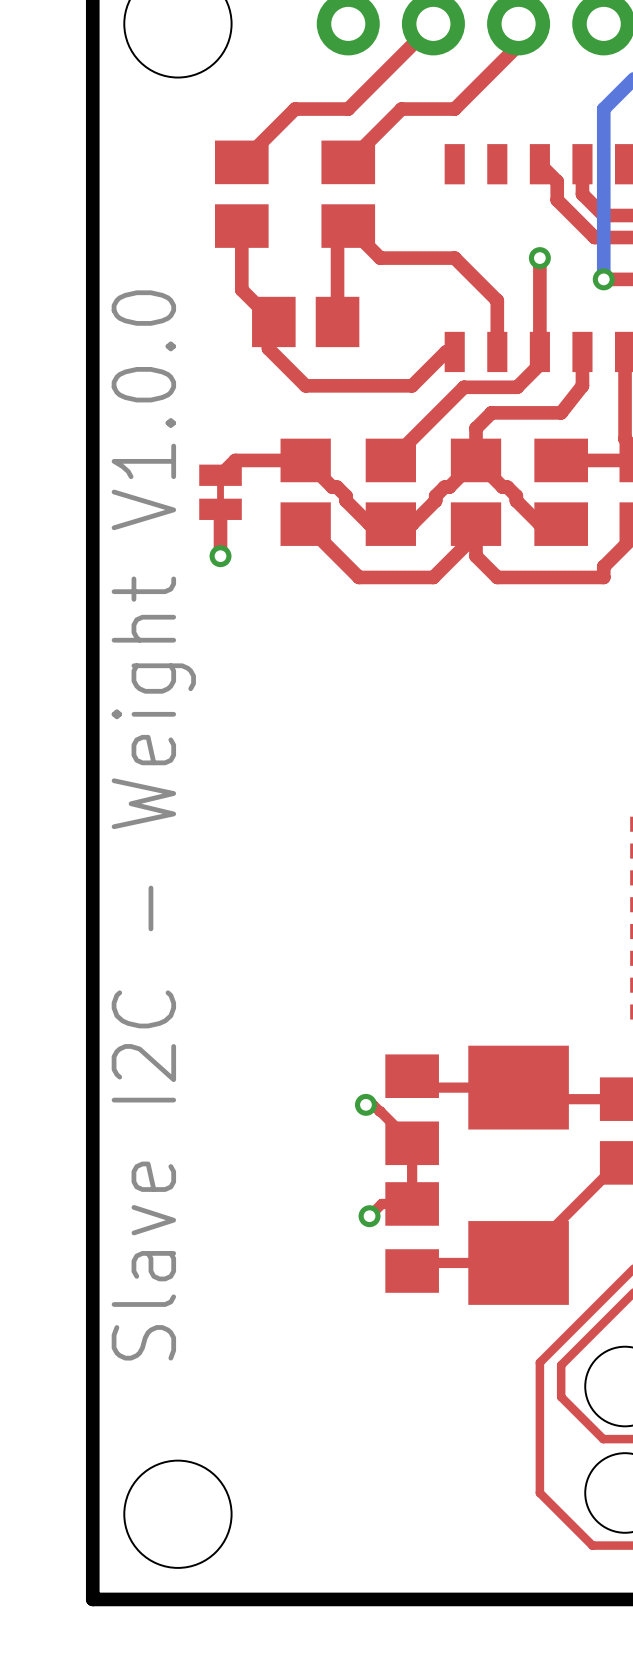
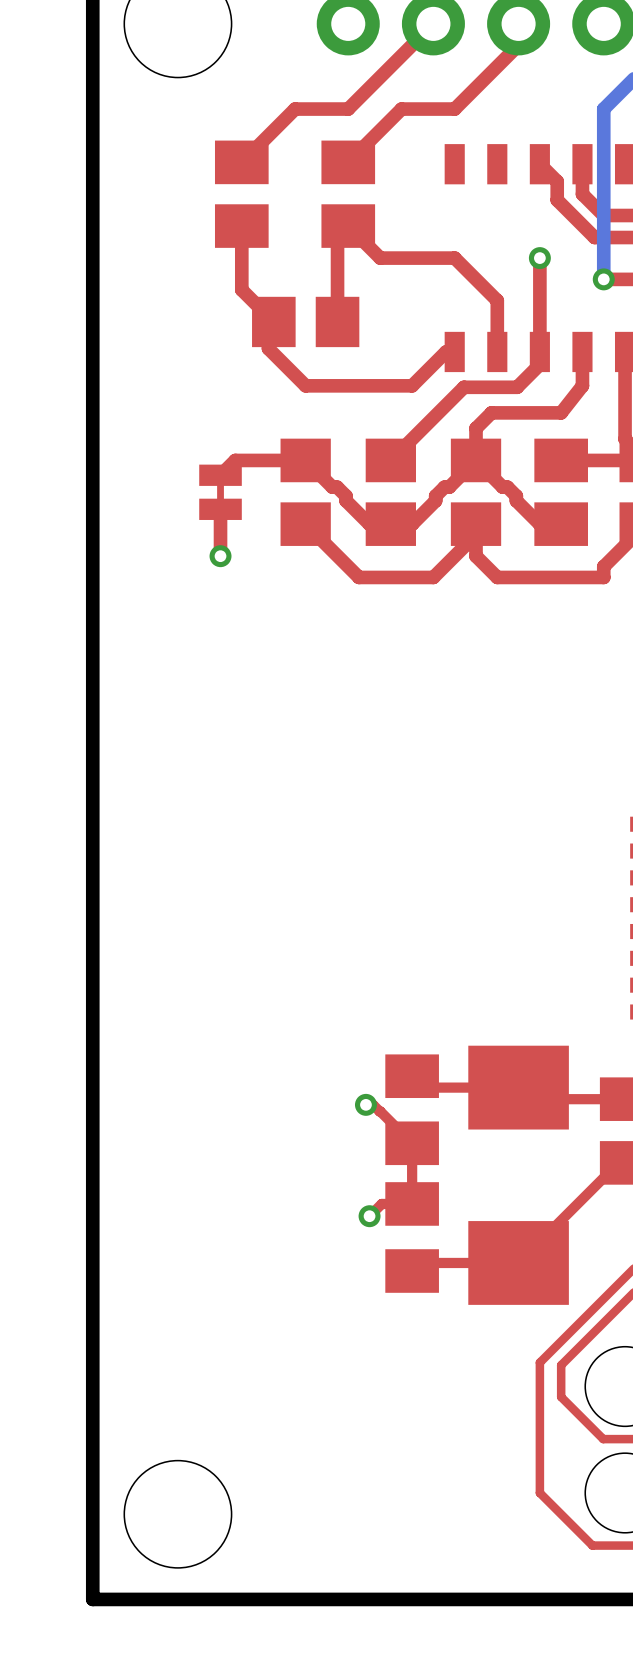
text: Slave I2C - Weight V1.0.0 (153, 825) -> none

